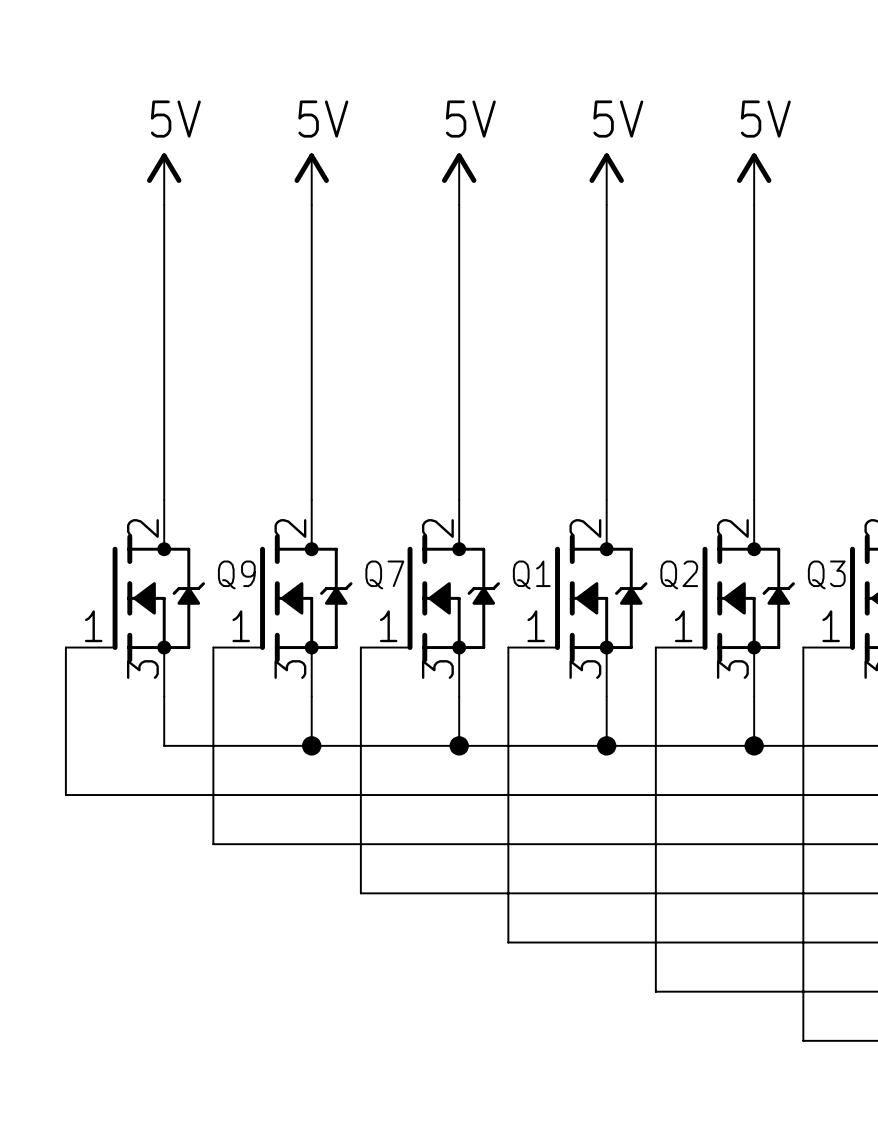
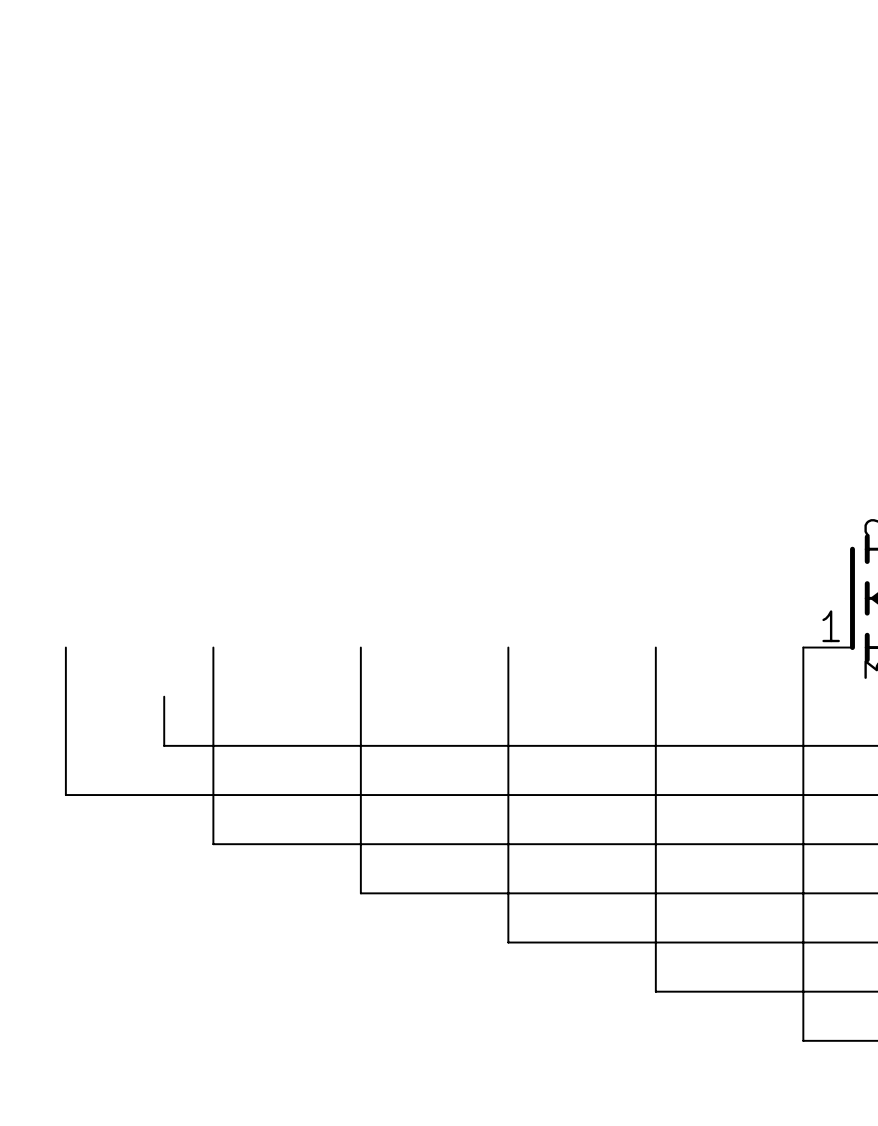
power symbol: 5V (164, 179) -> none
power symbol: 5V (311, 179) -> none
power symbol: 5V (459, 179) -> none
power symbol: 5V (606, 179) -> none
power symbol: 5V (754, 179) -> none
wire: (164, 205) (164, 500) -> none
wire: (311, 205) (311, 500) -> none
wire: (459, 205) (459, 500) -> none
wire: (606, 205) (606, 500) -> none
wire: (754, 205) (754, 500) -> none
Q9: (135, 598) -> none
Q7: (282, 598) -> none
Q1: (430, 598) -> none
Q2: (577, 598) -> none
Q3: (725, 598) -> none
wire: (311, 696) (311, 745) -> none
wire: (459, 696) (459, 745) -> none
wire: (606, 696) (606, 745) -> none
wire: (754, 696) (754, 745) -> none
junction: (311, 745) -> none
junction: (459, 745) -> none
junction: (606, 745) -> none
junction: (754, 745) -> none

